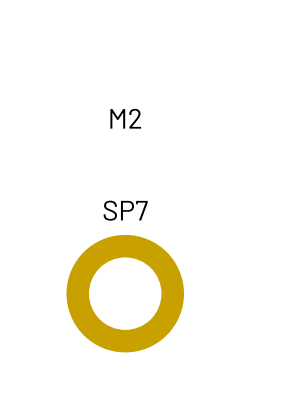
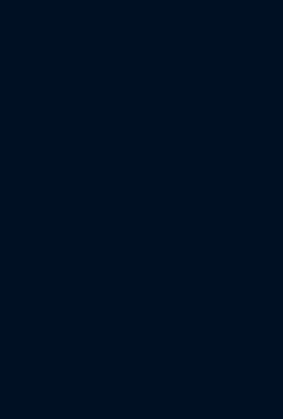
M2: (125, 118) -> none
SP7: (125, 293) -> none

